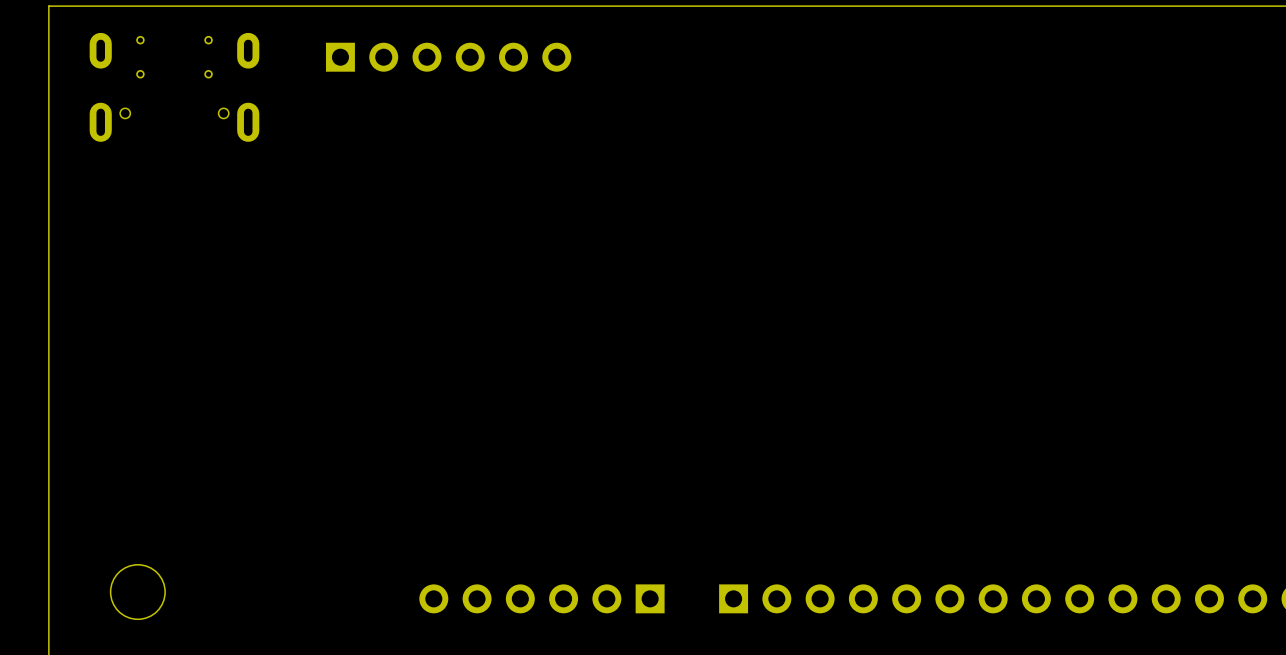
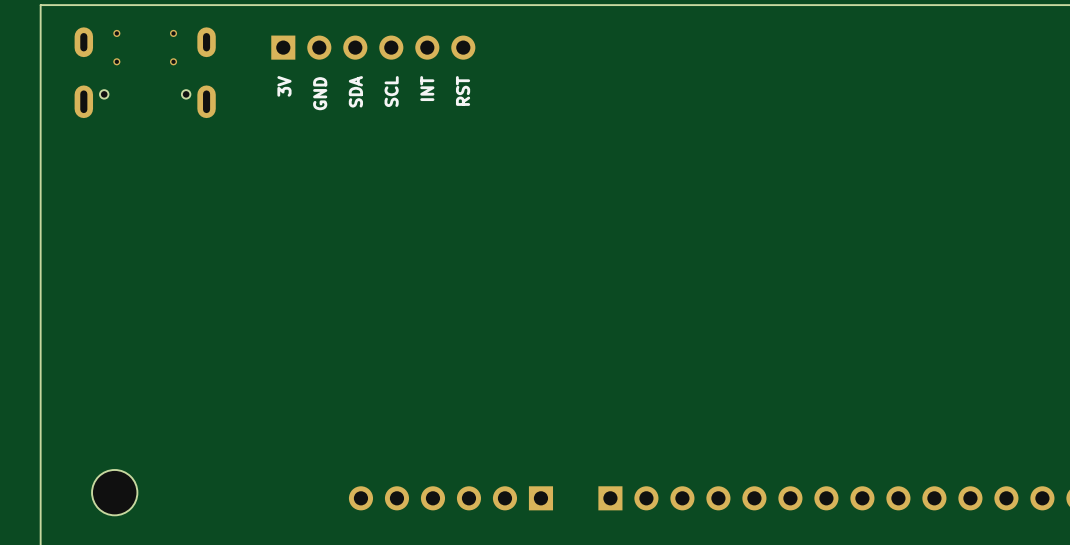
text: none -> 3V (284, 86)
text: none -> INT (427, 88)
text: none -> SCL (391, 91)
text: none -> RST (463, 90)
text: none -> SDA (355, 91)
text: none -> GND (320, 93)

